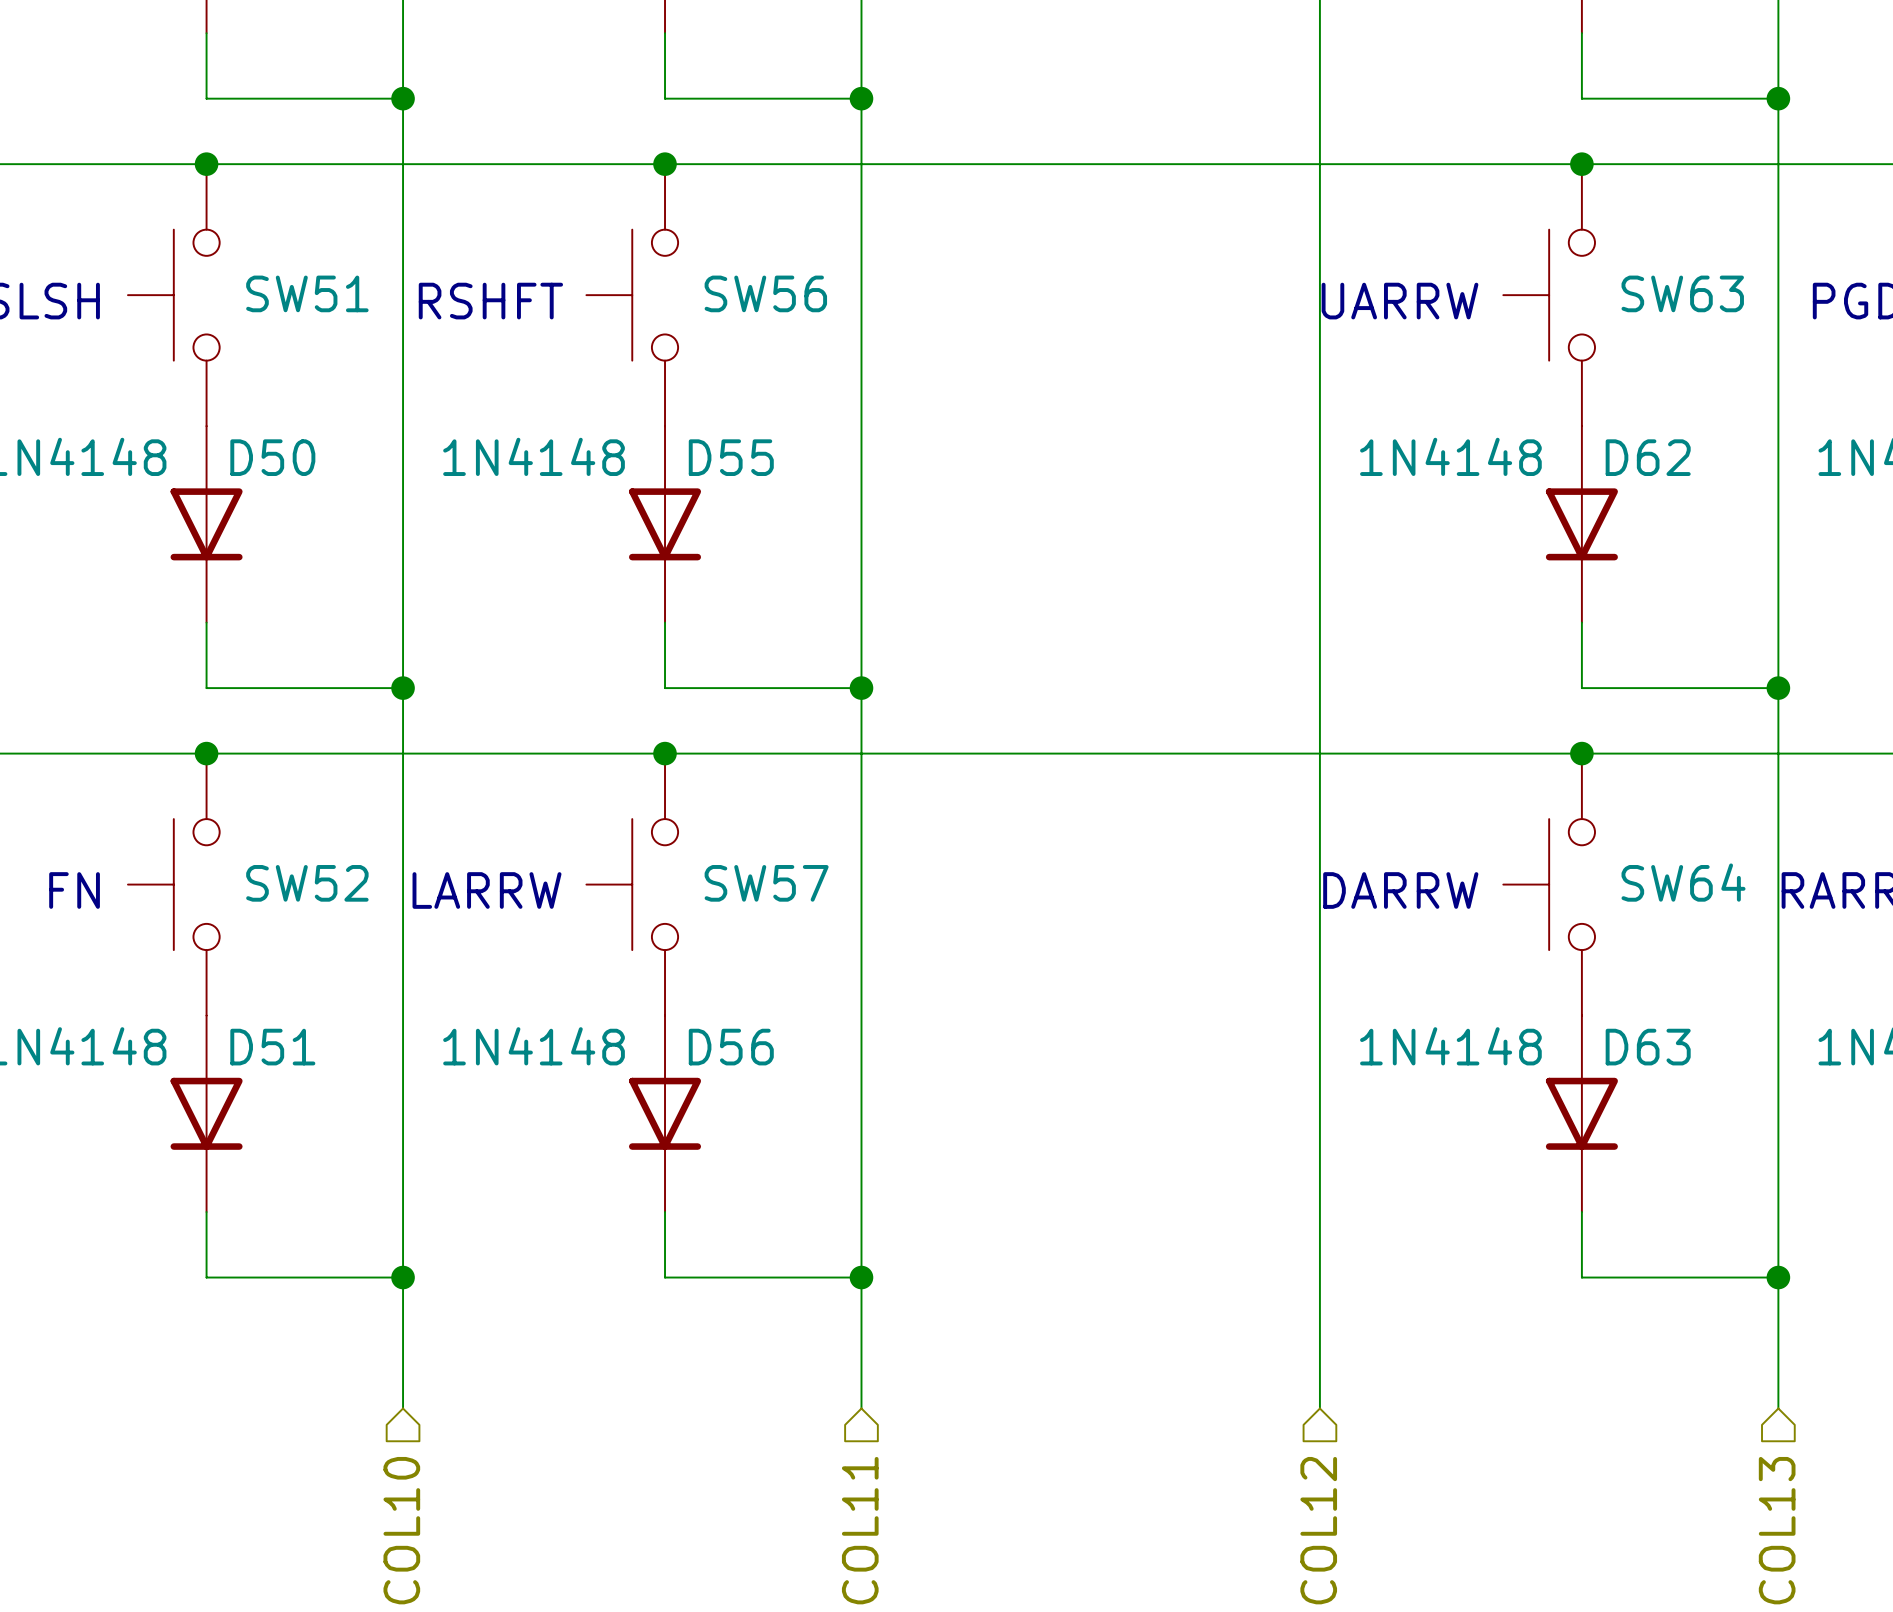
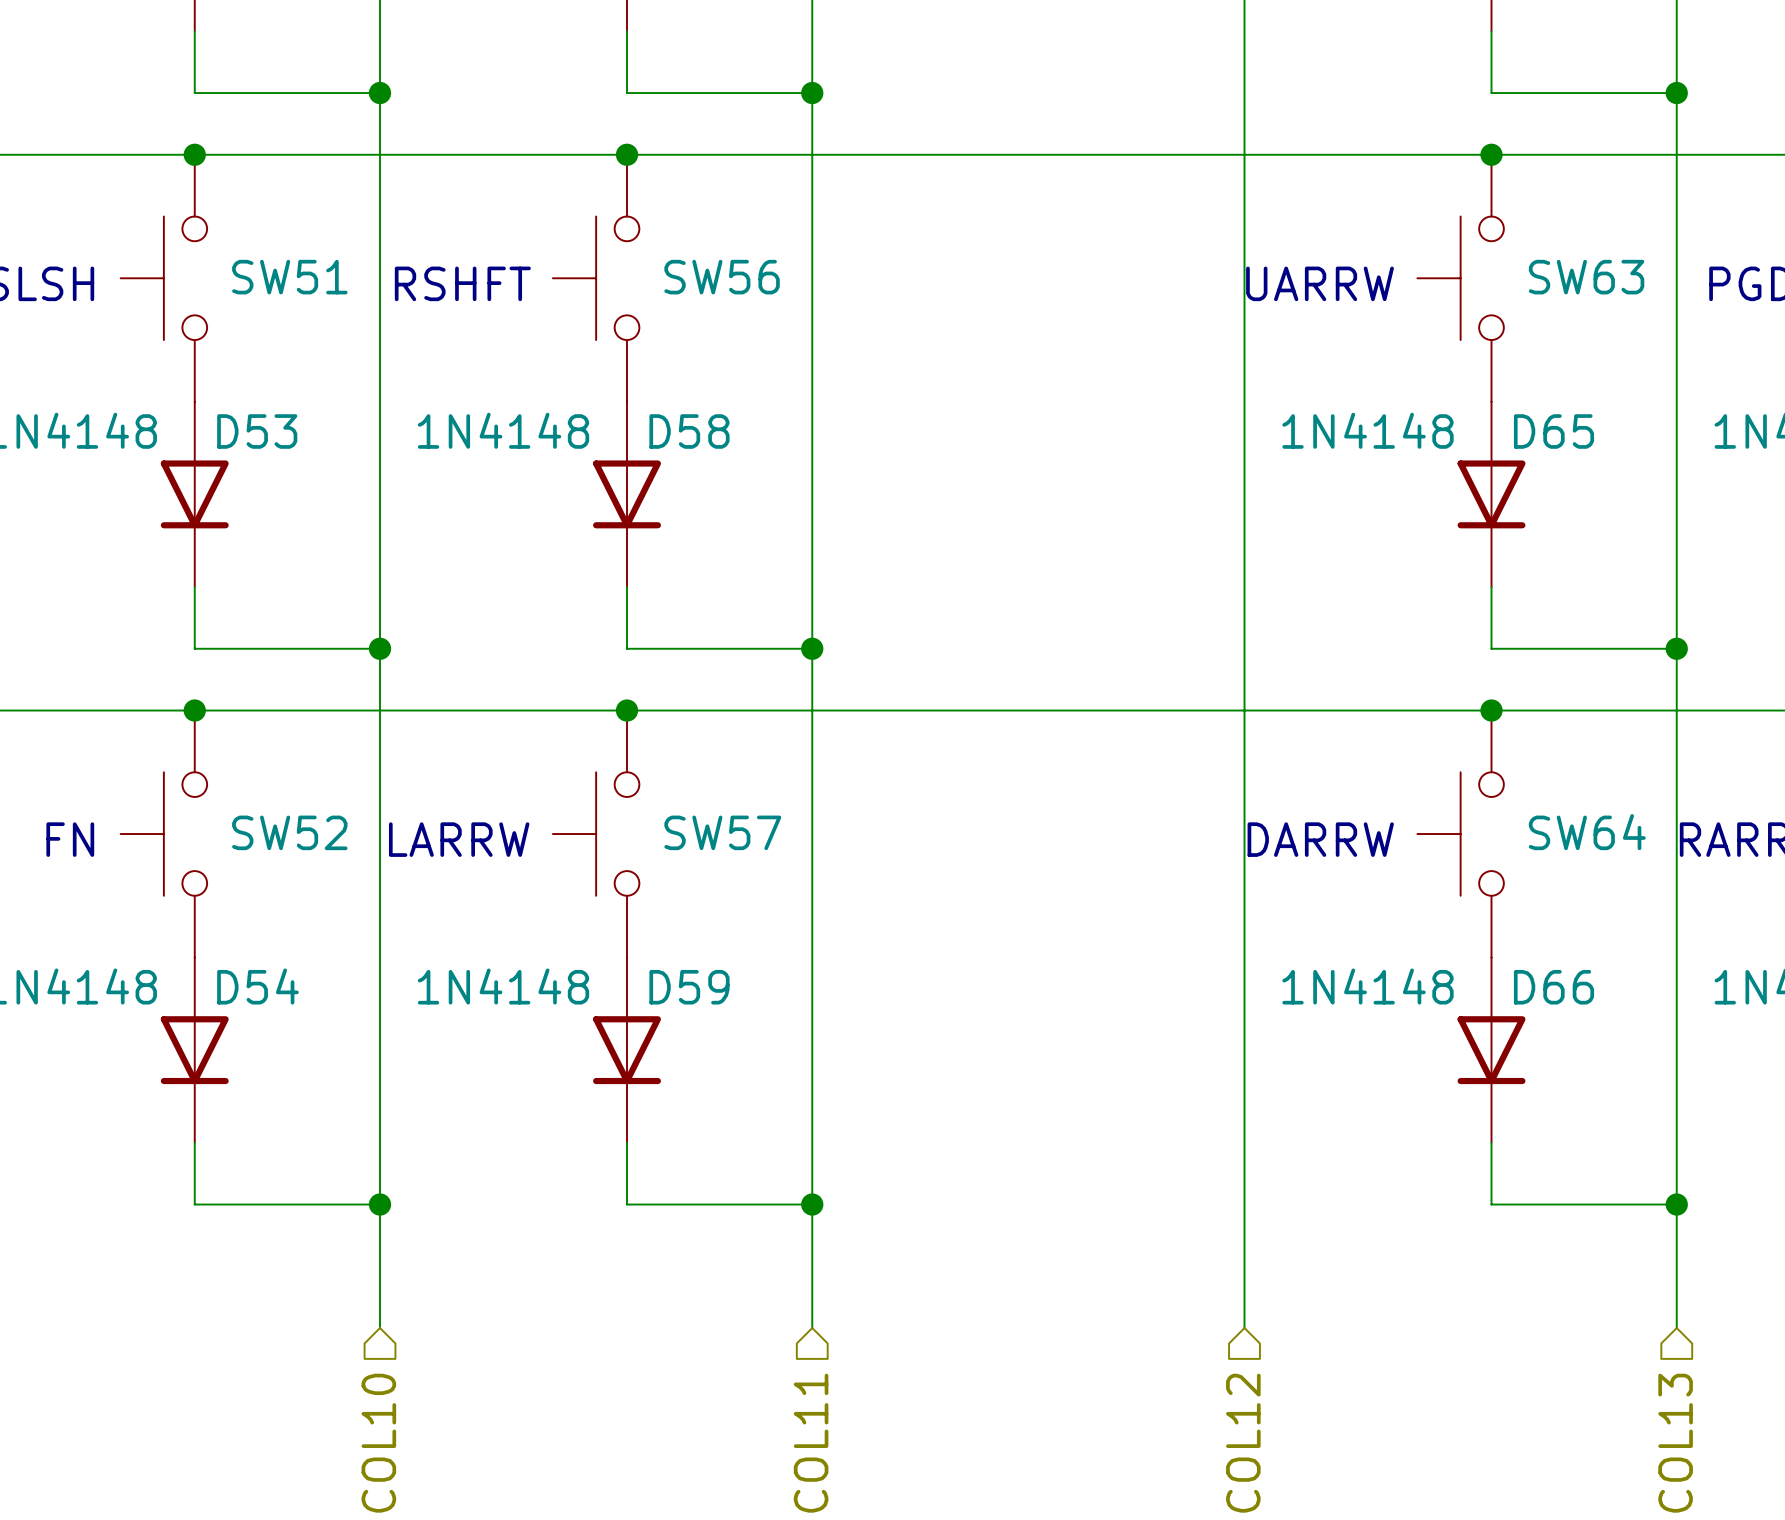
D50 name: D50 (272, 457) -> D53 (257, 431)
D55 name: D55 (731, 457) -> D58 (689, 431)
D62 name: D62 (1648, 457) -> D65 (1553, 431)
D51 name: D51 (272, 1047) -> D54 (257, 986)
D56 name: D56 (731, 1047) -> D59 (689, 987)
D63 name: D63 (1648, 1047) -> D66 (1553, 987)

